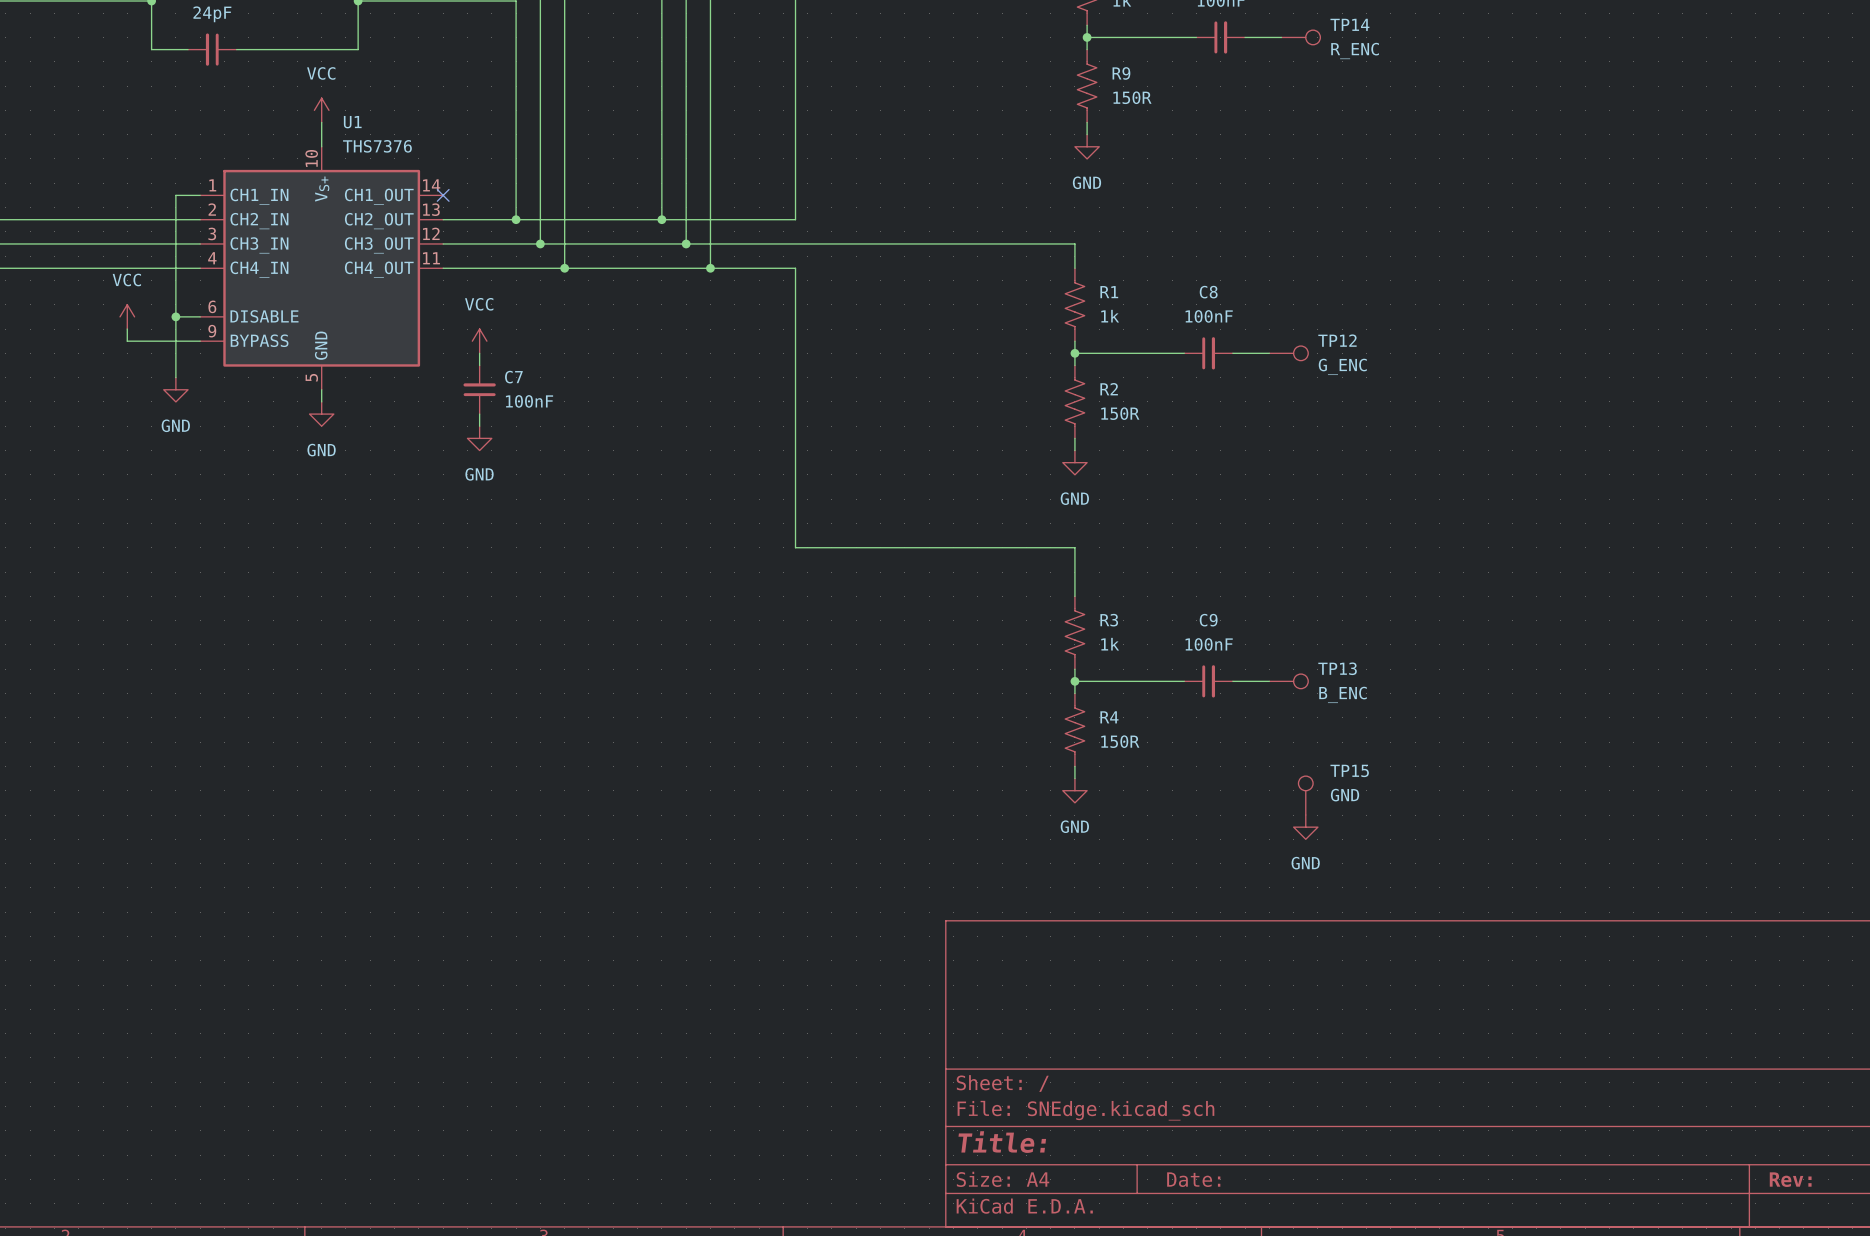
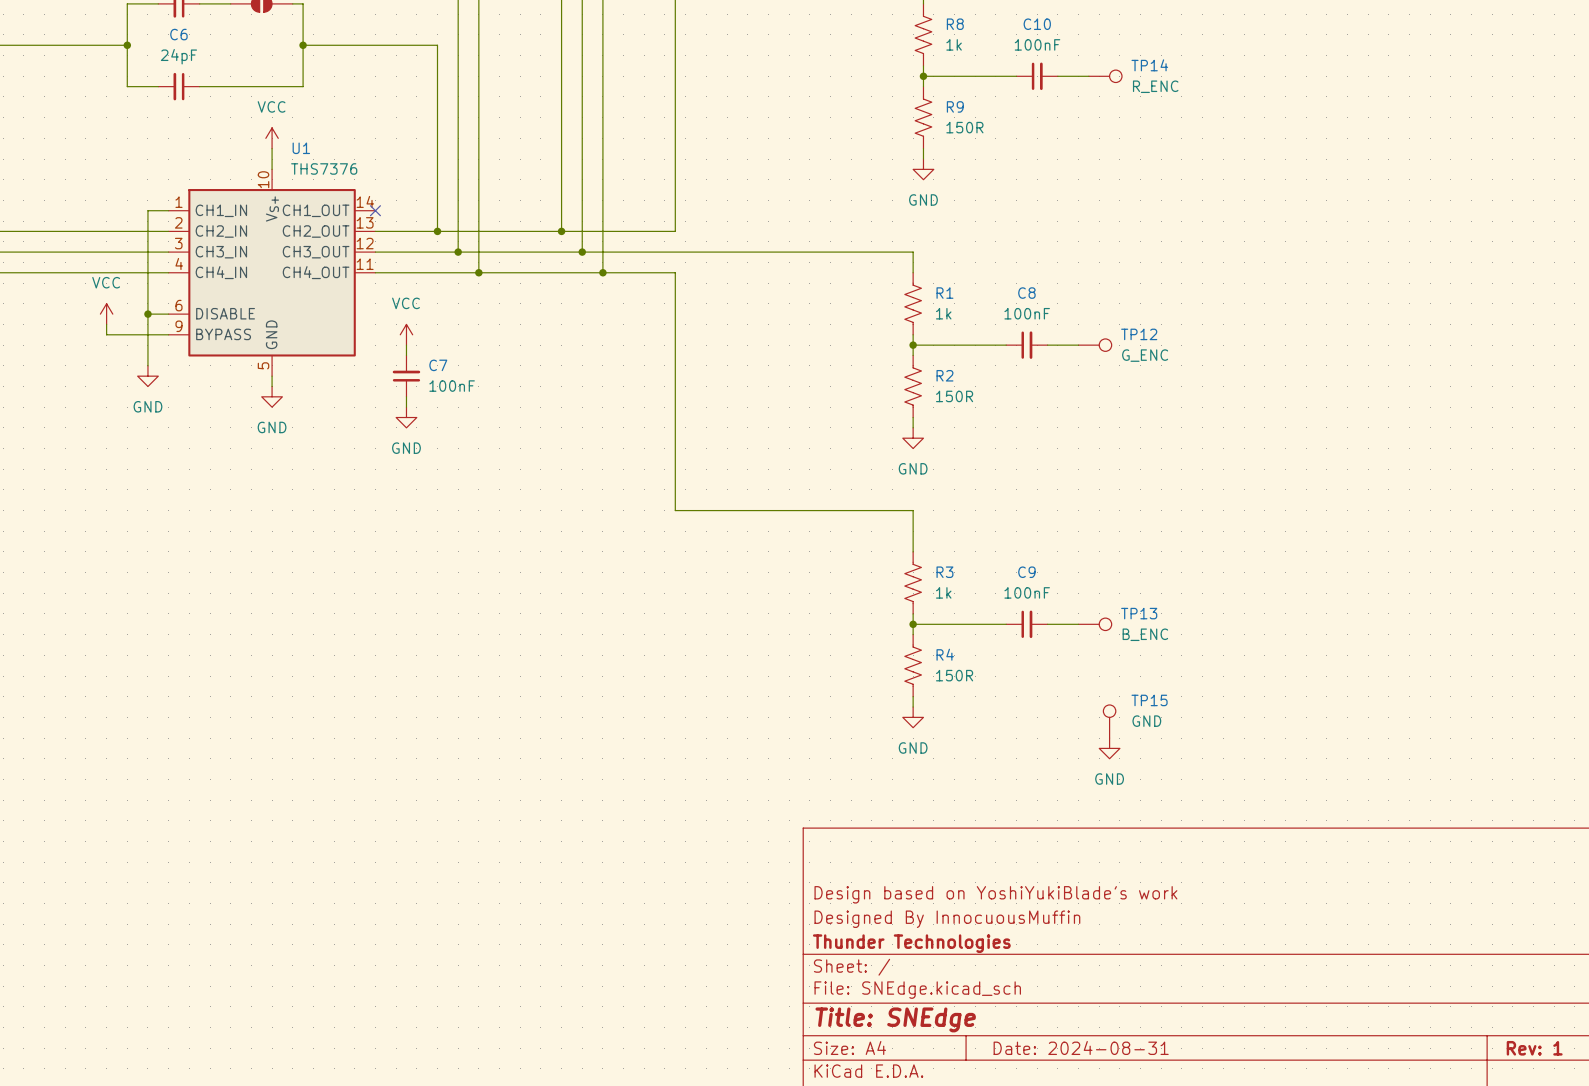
title block: none -> Design based on YoshiYukiBlade's work (995, 894)
title block: none -> Designed By InnocuousMuffin (947, 919)
title block: none -> Thunder Technologies (911, 943)
title block: Title: (1002, 1142) -> Title: SNEdge (895, 1019)
title block: Date: (1193, 1179) -> Date: 2024-08-31 (1081, 1047)
title block: Rev: (1790, 1179) -> Rev: 1 (1534, 1048)

